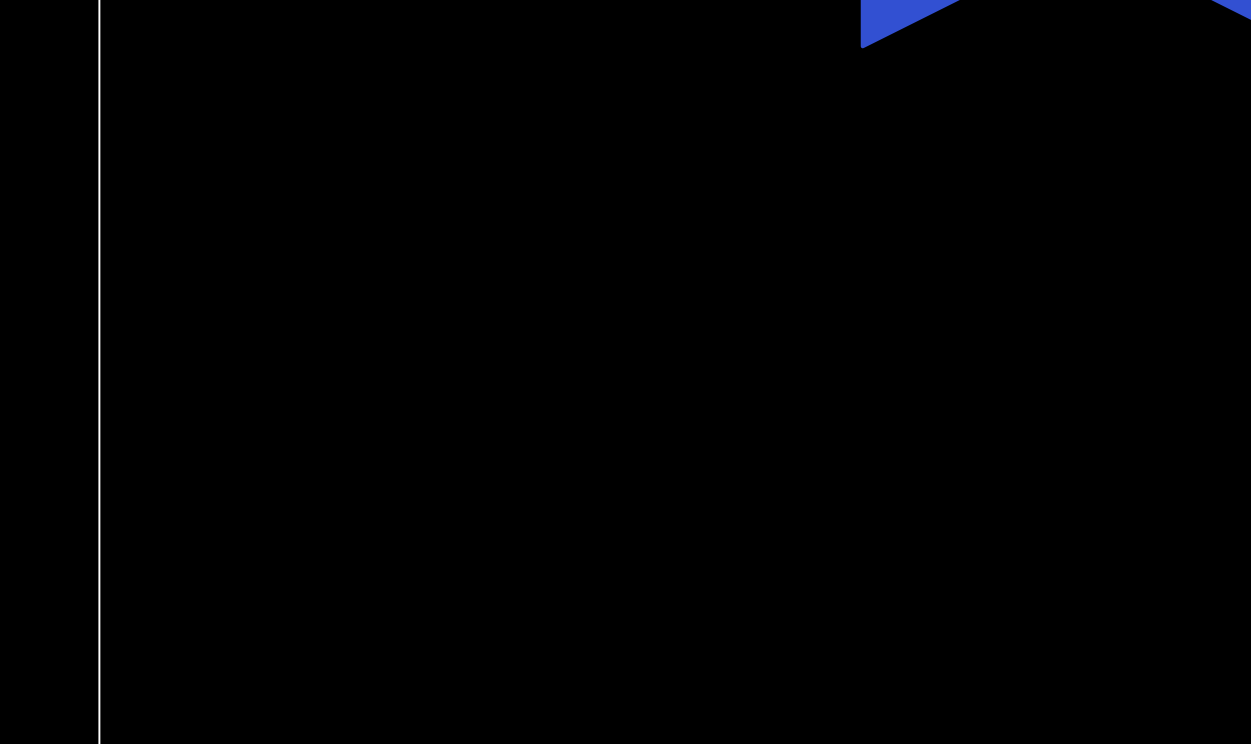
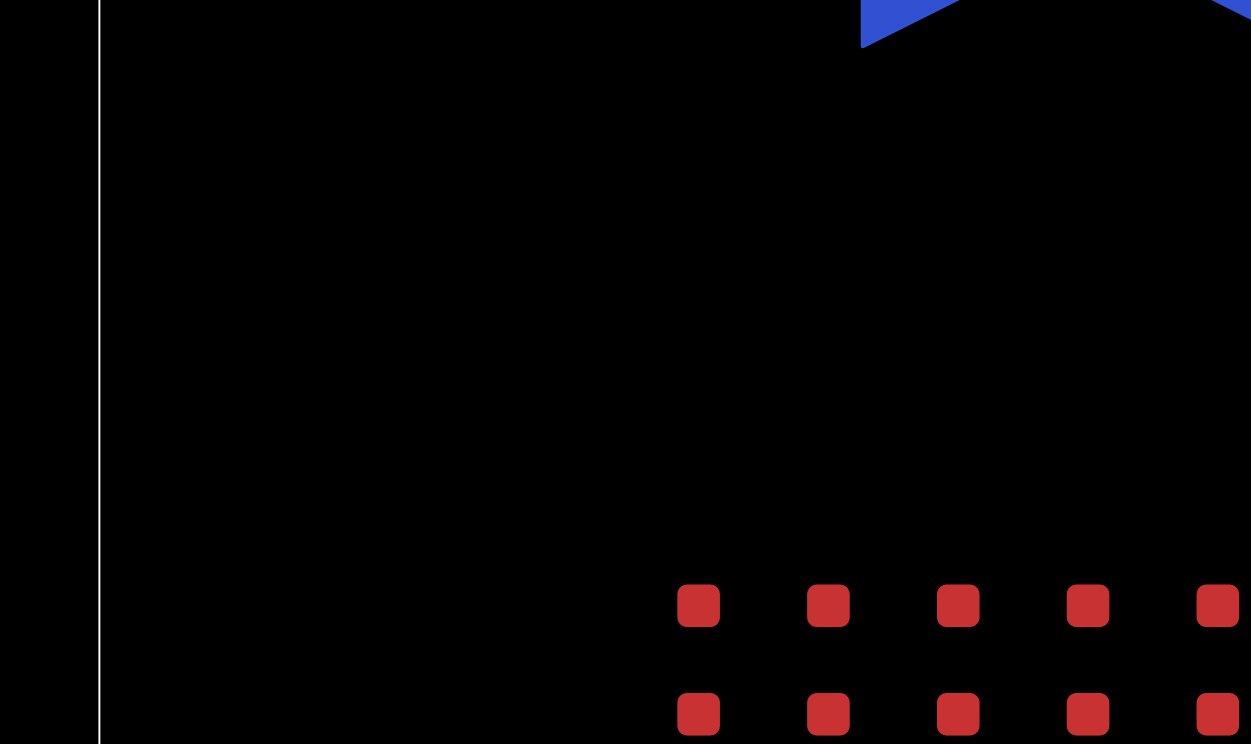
part: none -> (698, 660)
part: none -> (828, 660)
part: none -> (958, 660)
part: none -> (1088, 660)
part: none -> (1217, 660)

